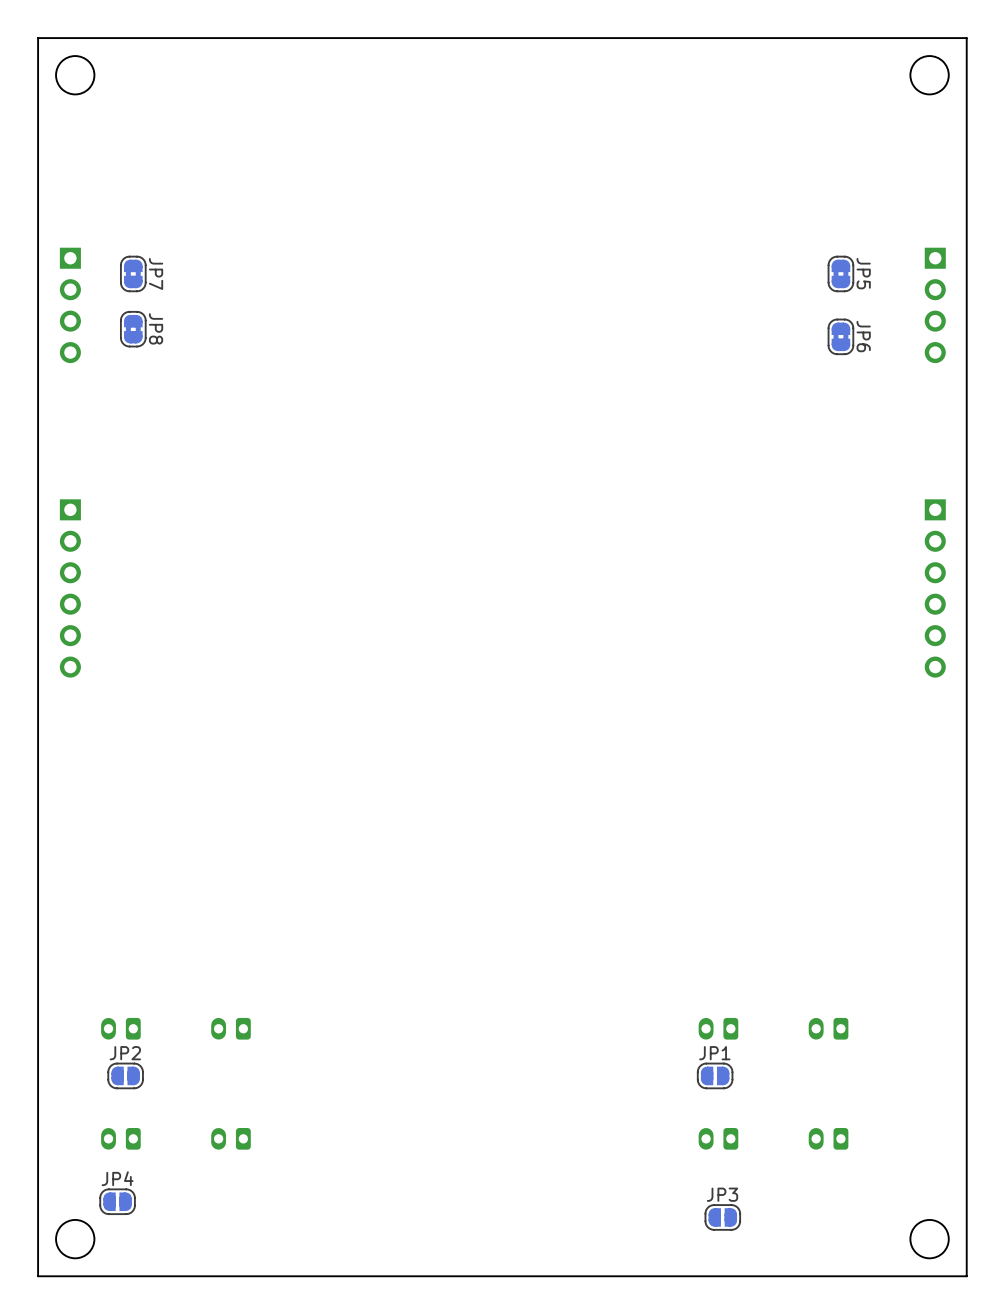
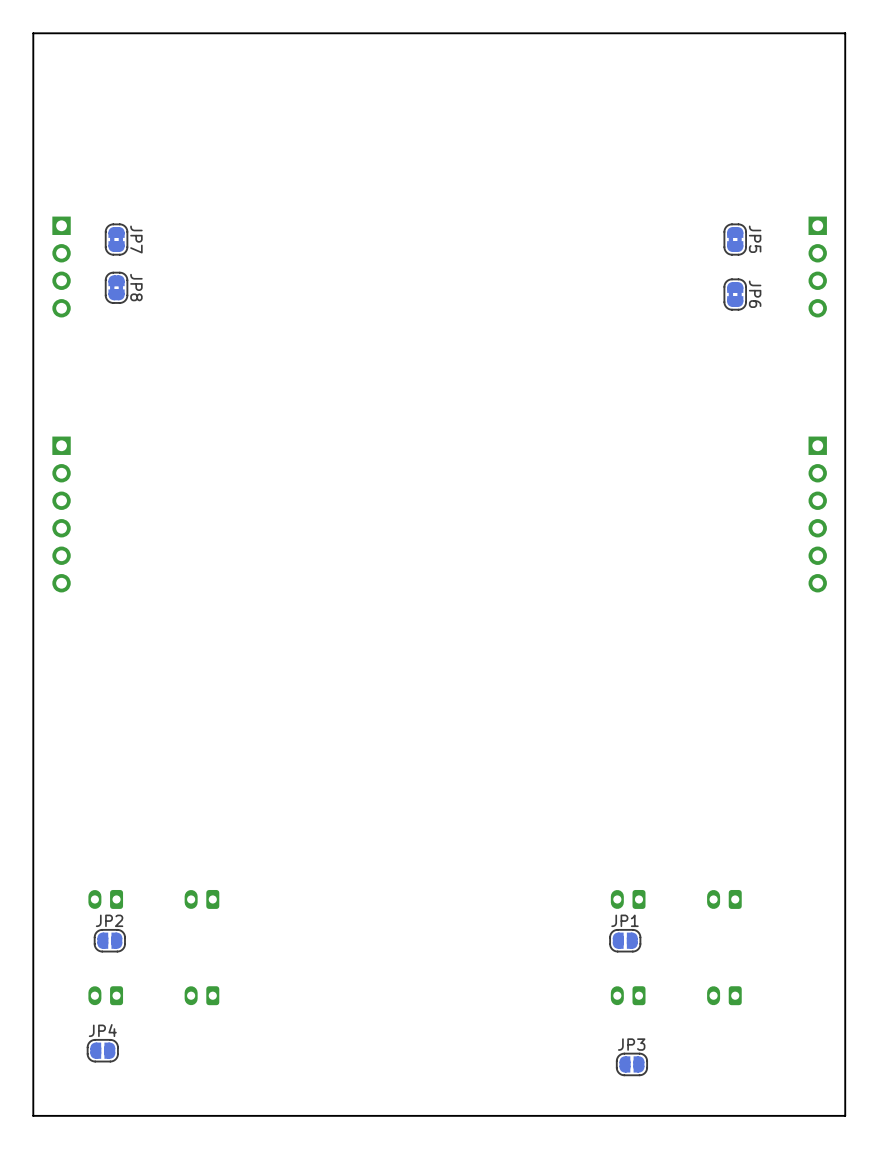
round board edge: [55, 55, 95, 95] -> none
round board edge: [910, 55, 949, 95] -> none
round board edge: [55, 1219, 95, 1259] -> none
round board edge: [910, 1219, 949, 1259] -> none

